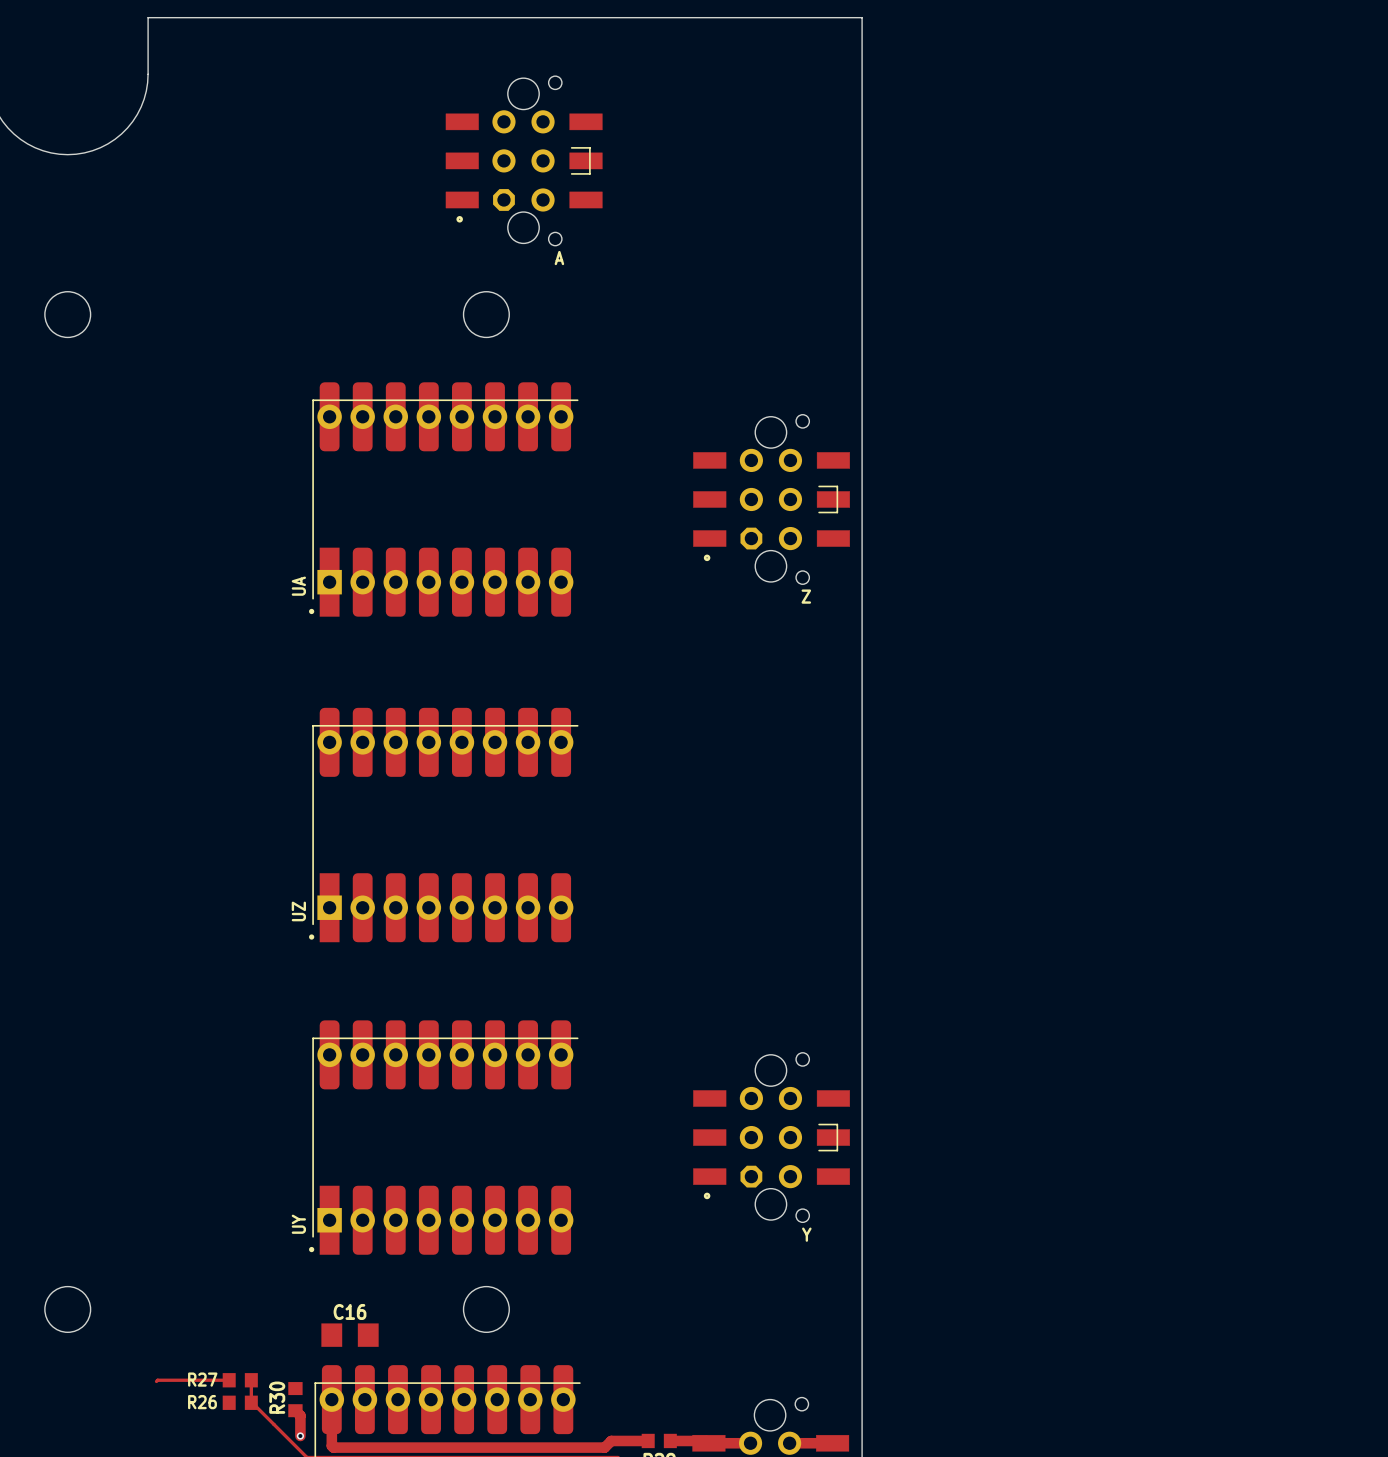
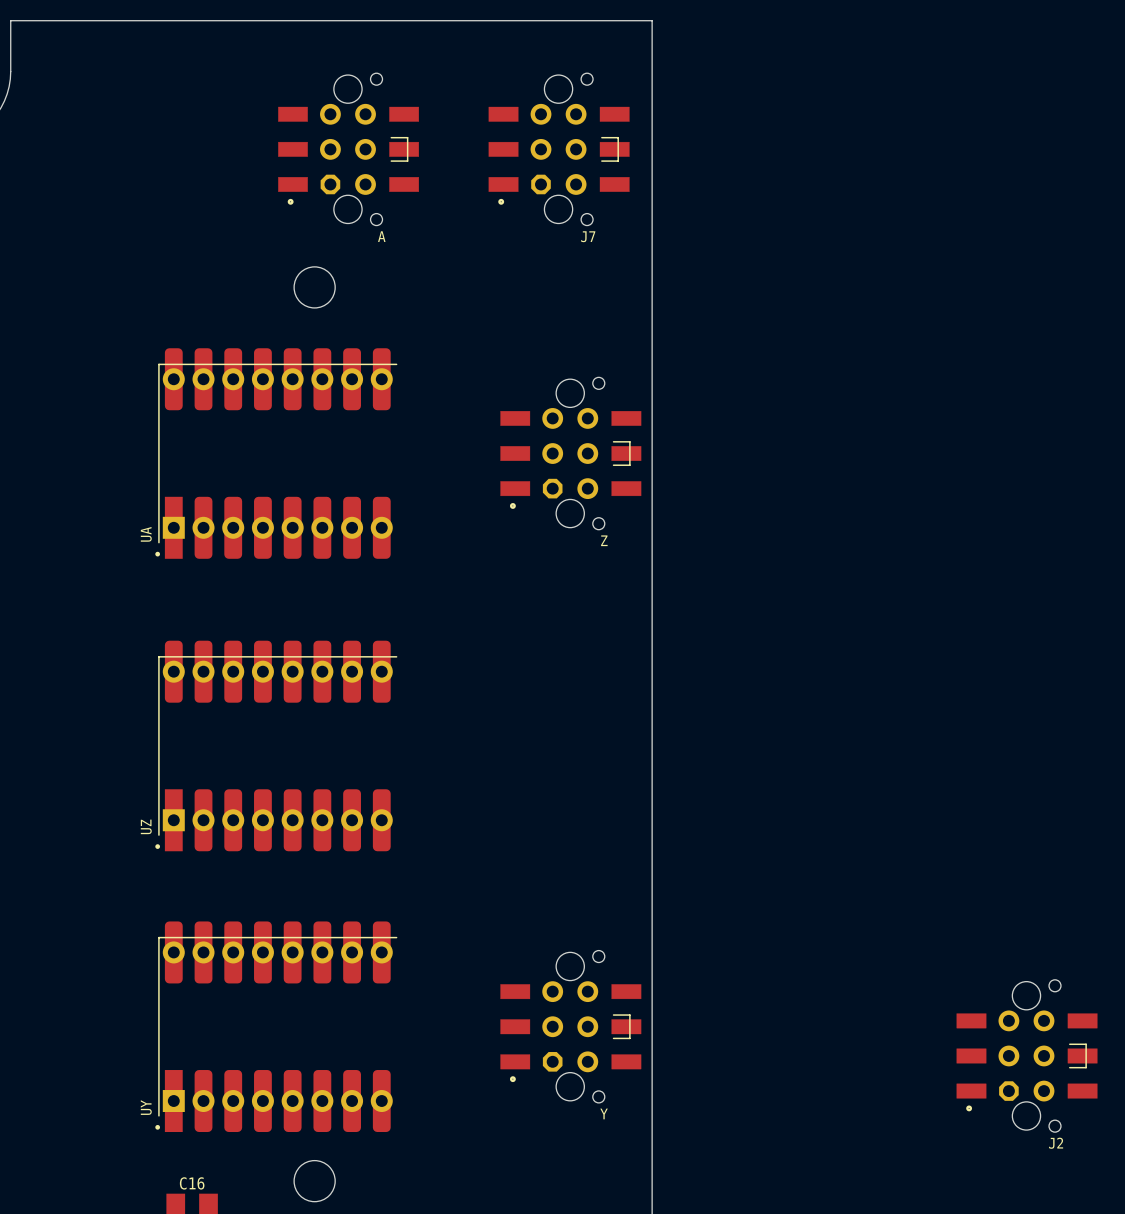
J7: none -> (559, 149)
J2: none -> (1027, 1055)

